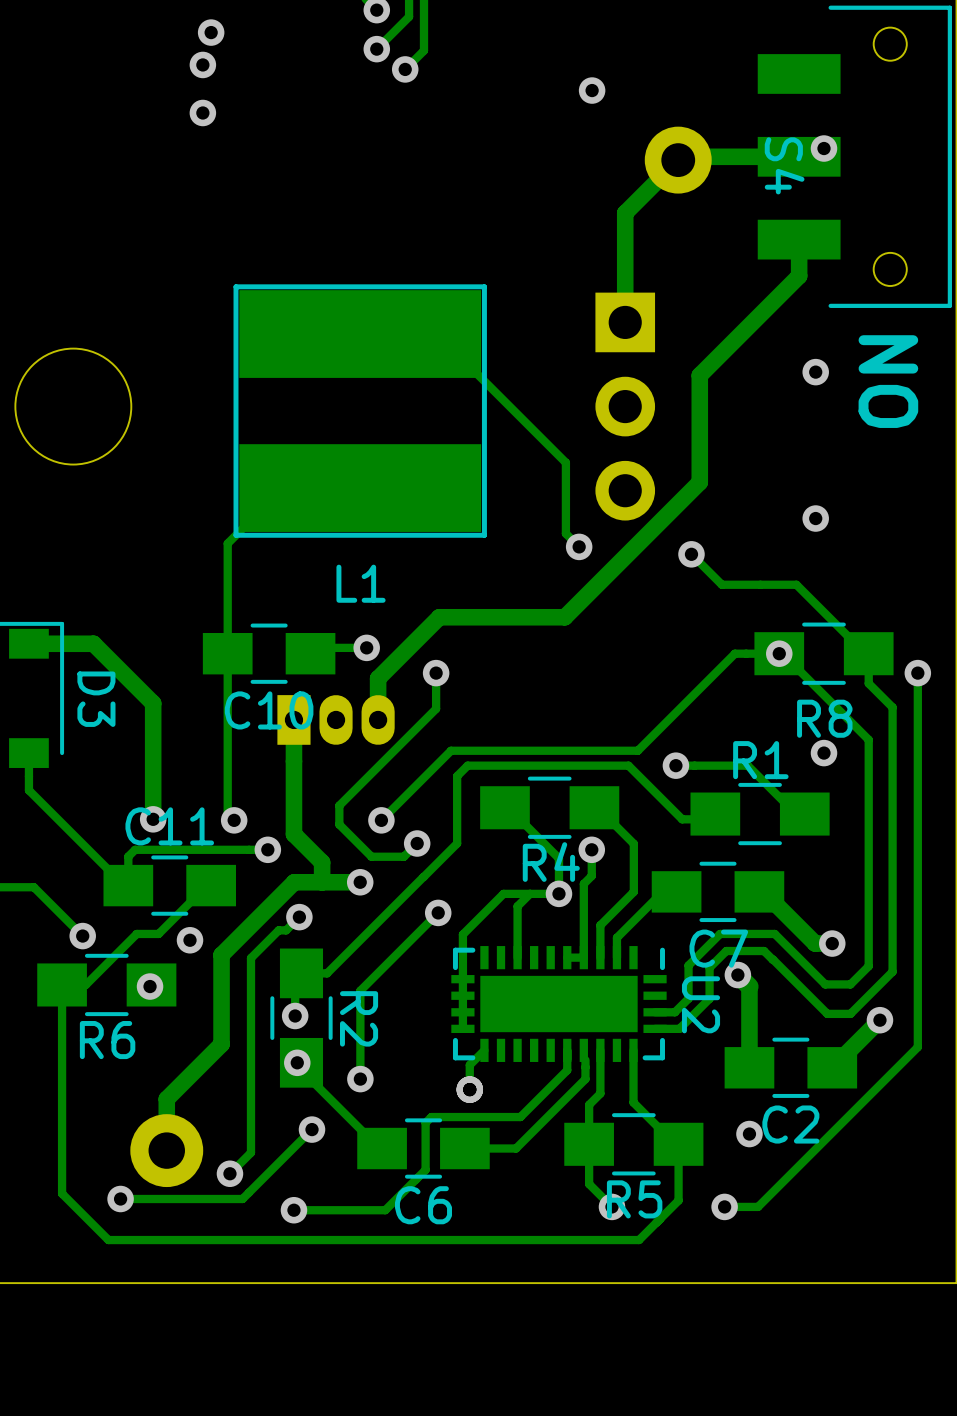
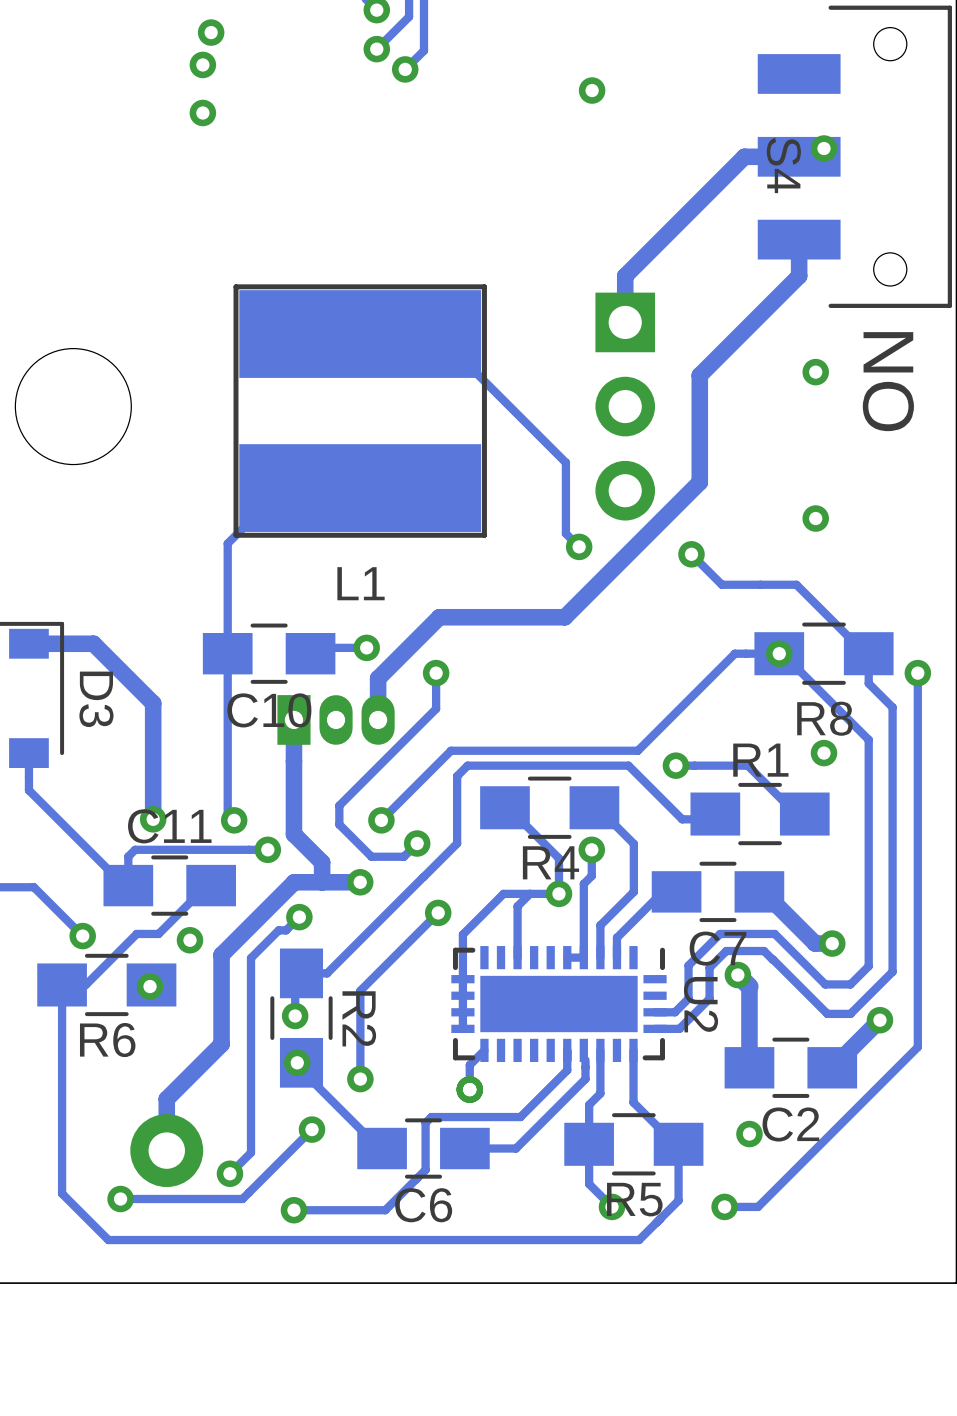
track: (744, 156) (681, 156) (625, 213) (625, 276) -> (744, 156) (625, 276)
part: (678, 160) -> none

